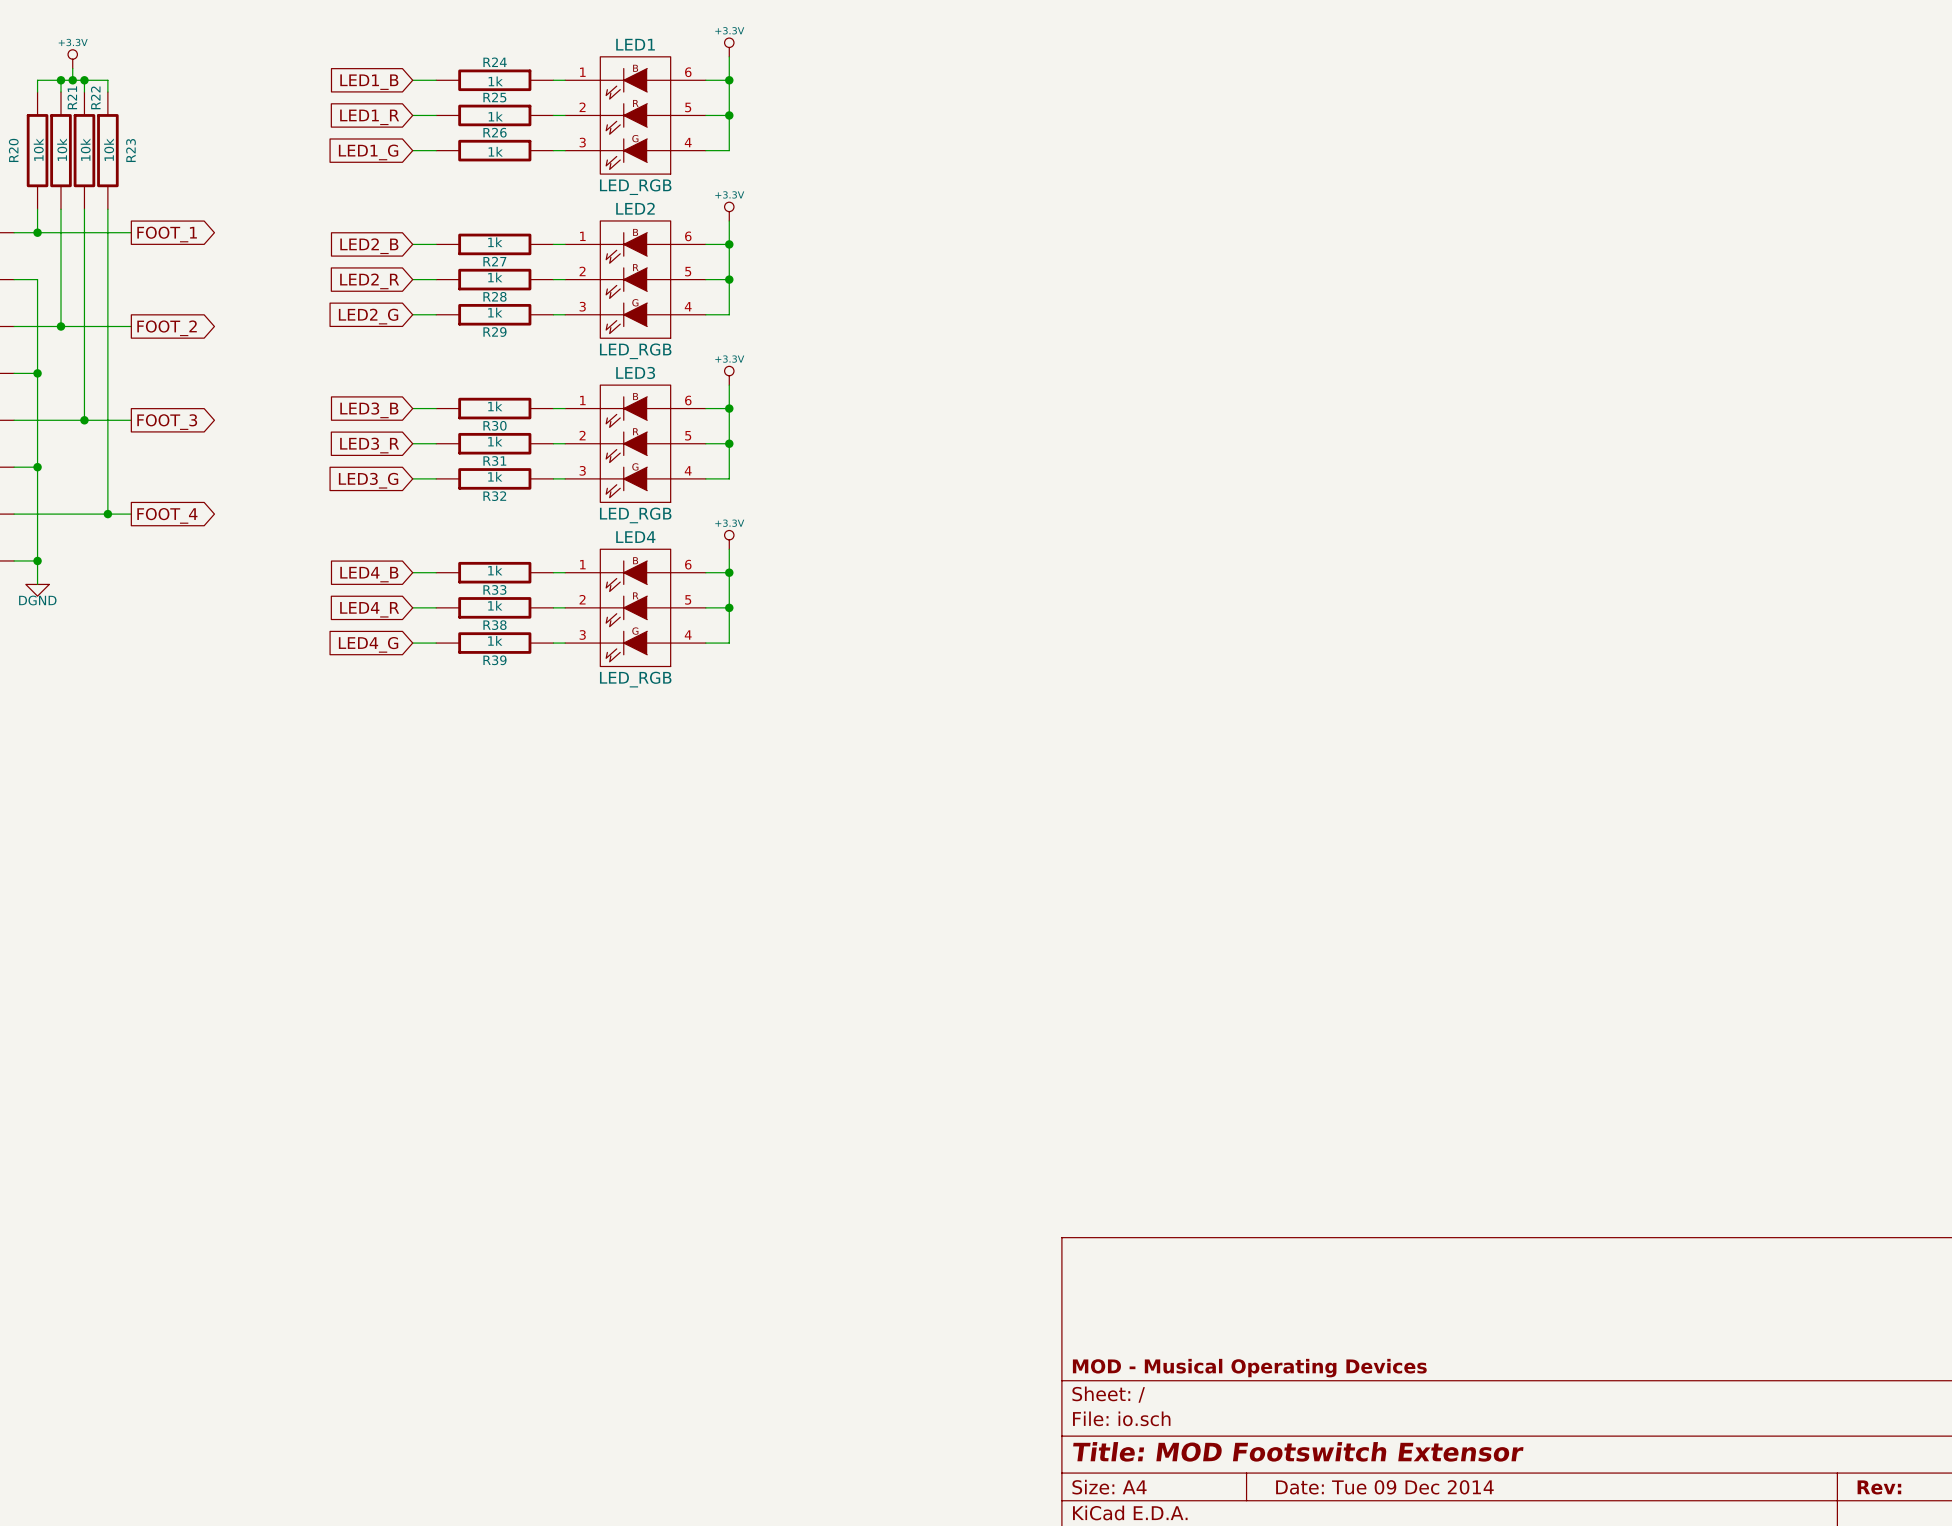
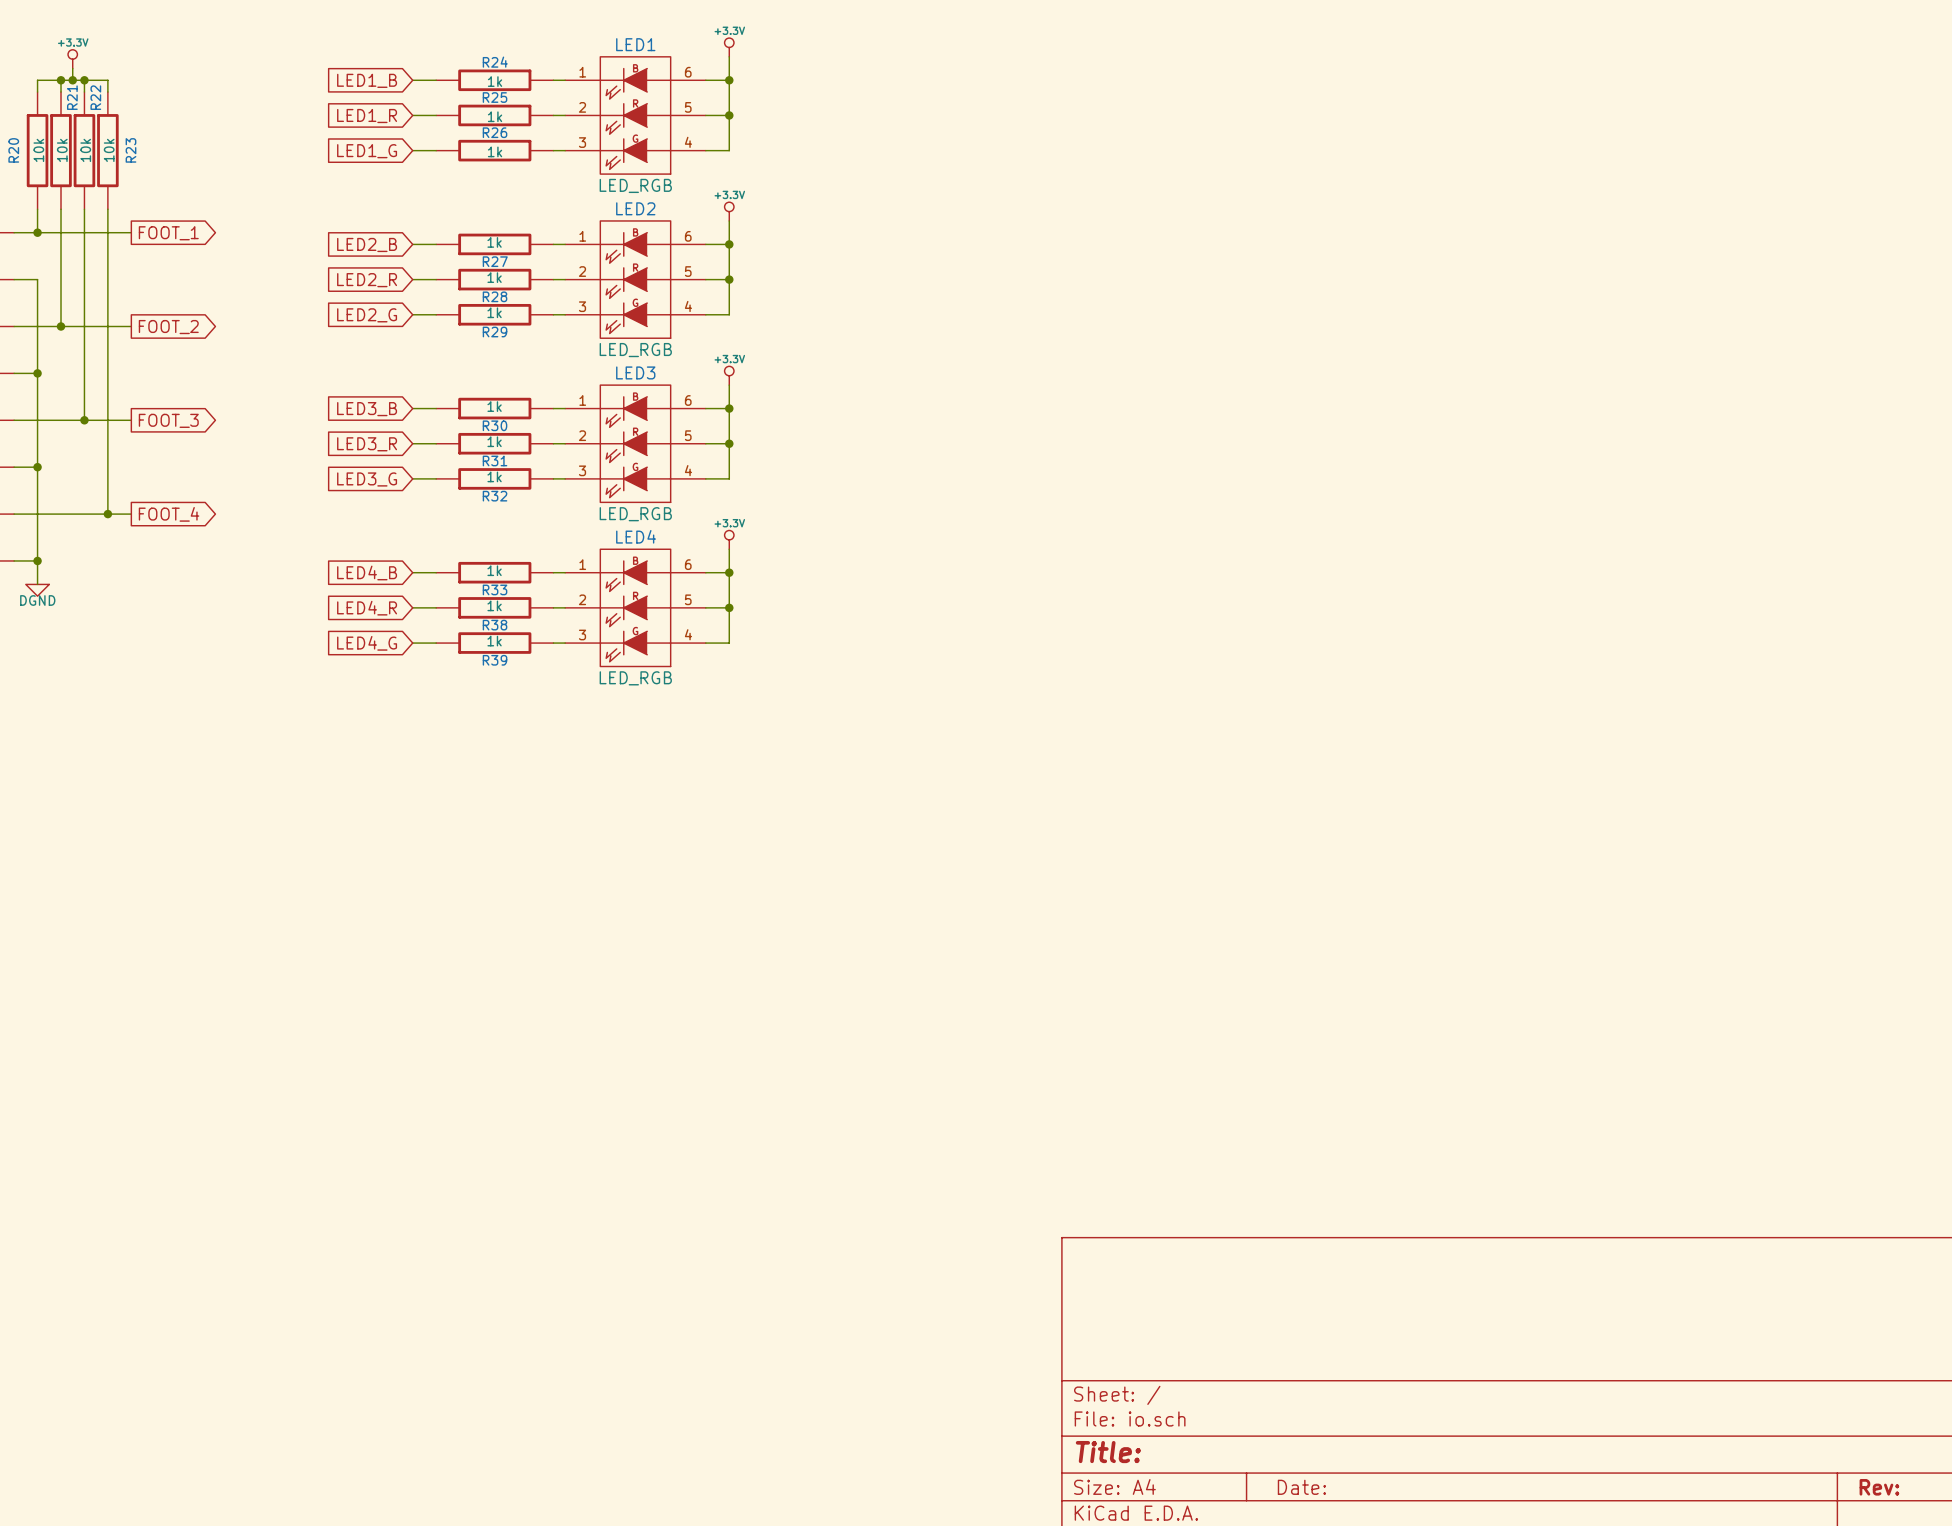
title block: MOD - Musical Operating Devices (1249, 1368) -> none
title block: Title: MOD Footswitch Extensor (1298, 1451) -> Title: (1108, 1452)
title block: Date: Tue 09 Dec 2014 (1384, 1487) -> Date: (1301, 1487)

